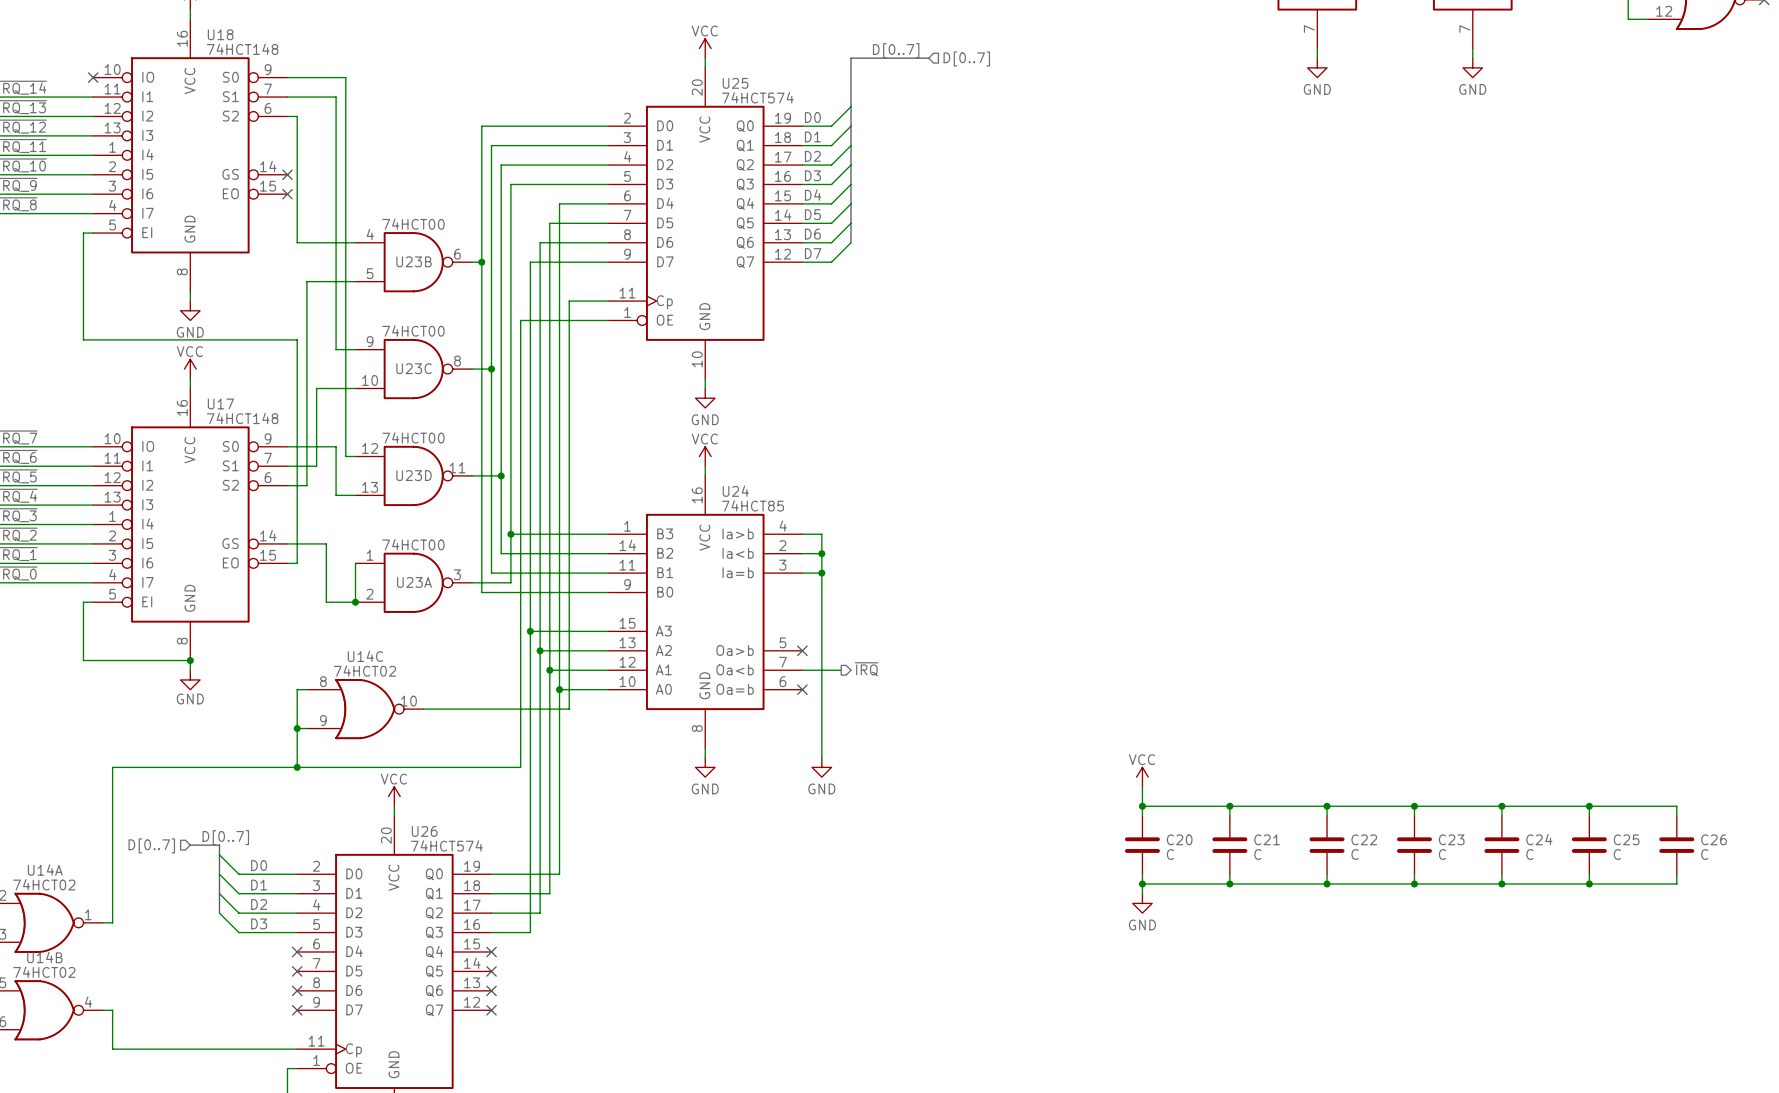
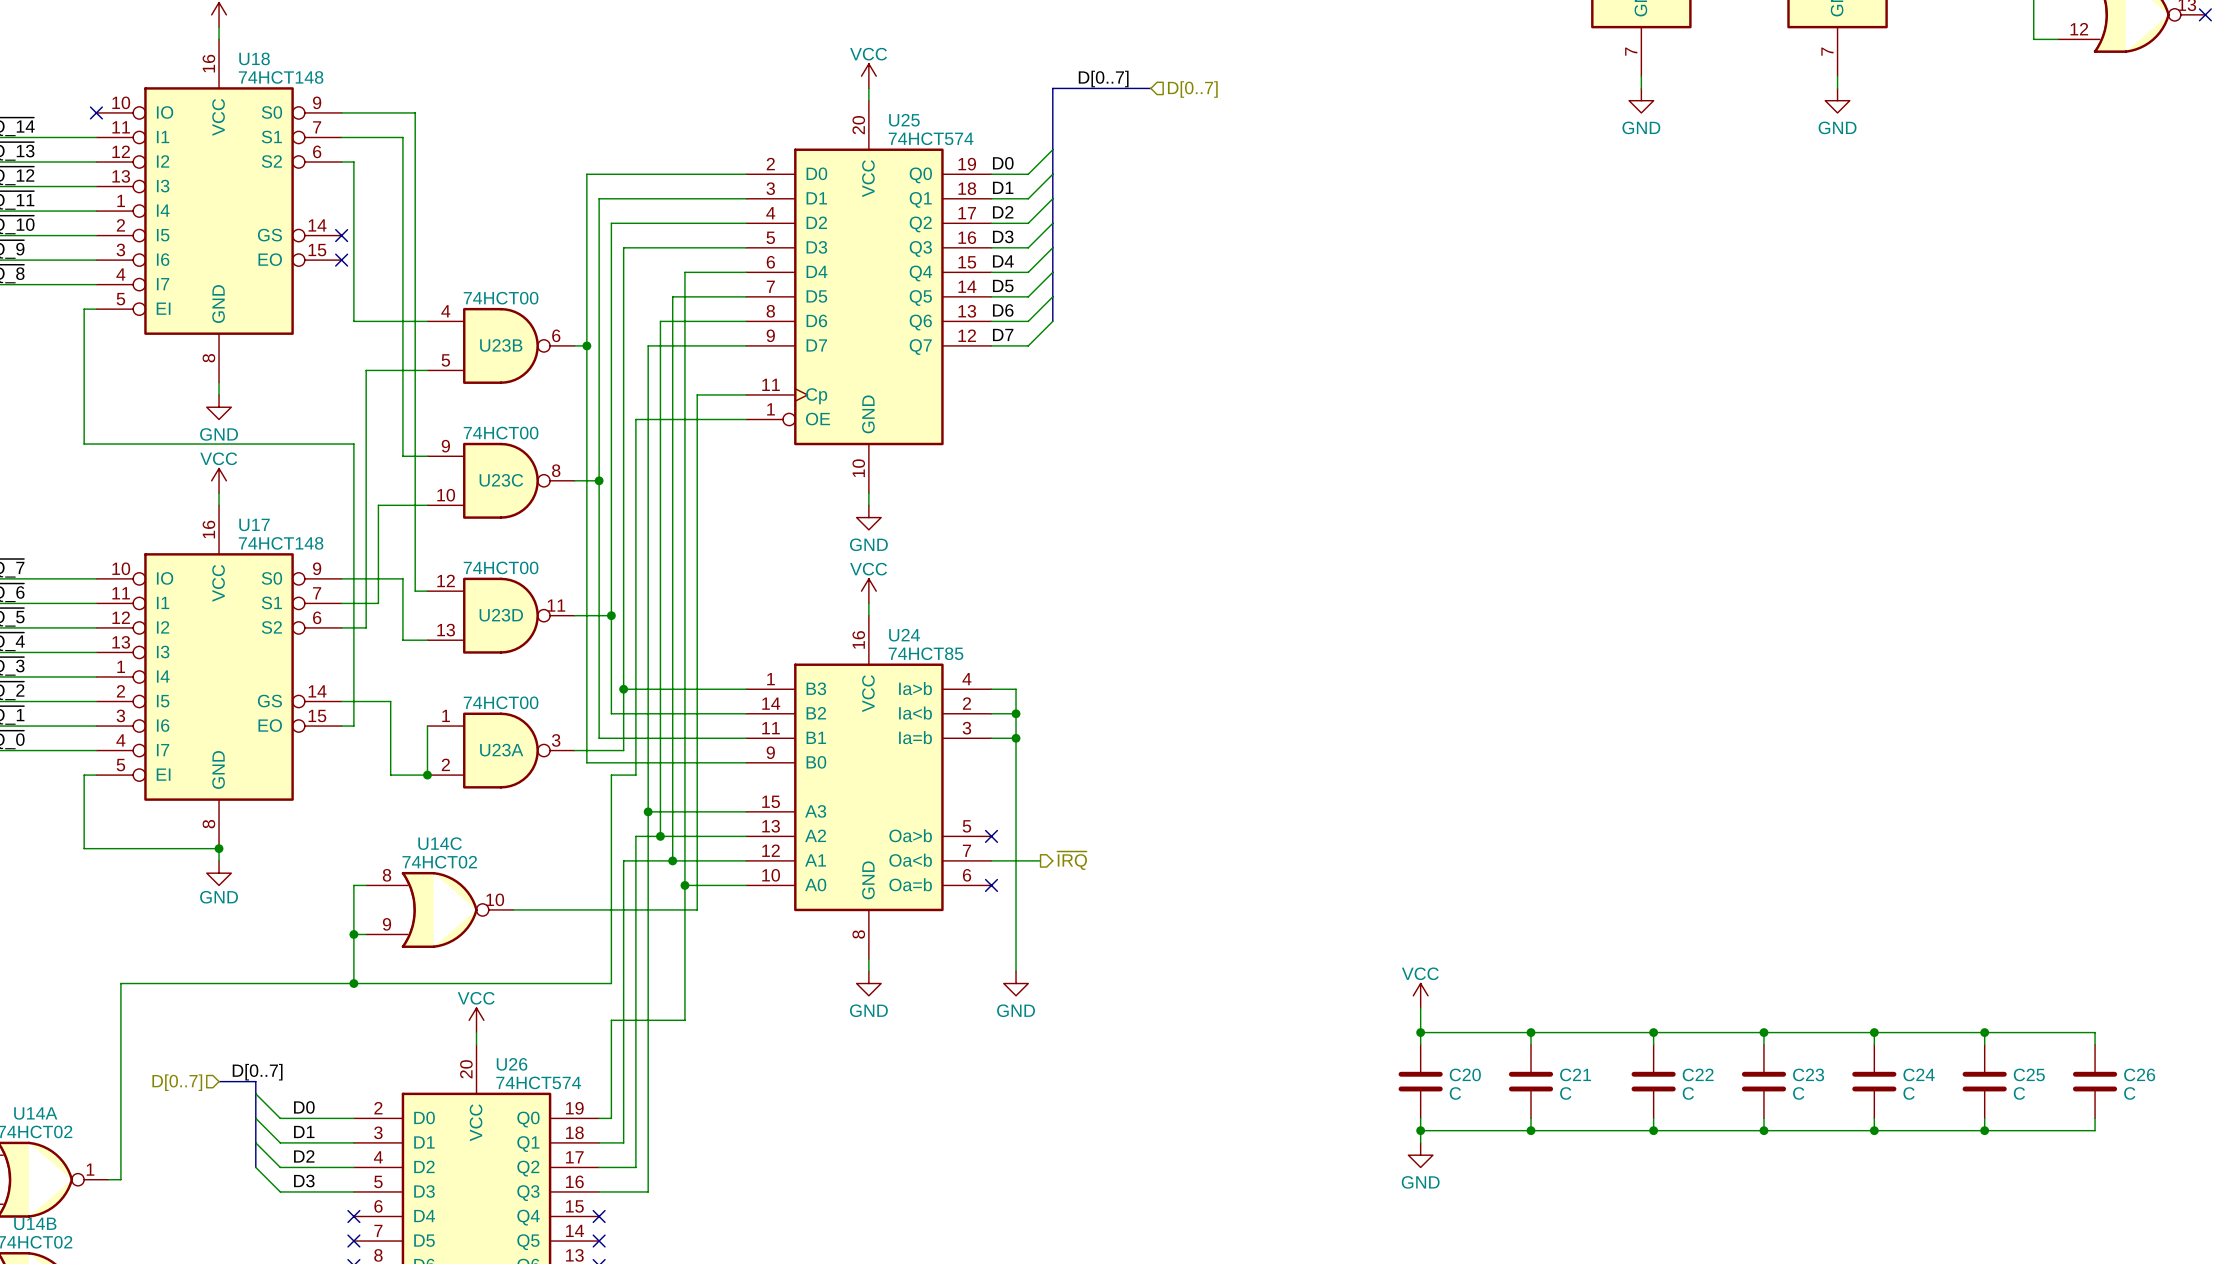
wire: (520, 602) (520, 650) -> (660, 836) (635, 836)
wire: (540, 650) (540, 913) (520, 913) -> (635, 983) (635, 1167)
wire: (549, 670) (549, 893) (510, 893) -> (672, 860) (623, 860) (623, 1142)
wire: (501, 767) (520, 767) -> (611, 983) (611, 775) (635, 775)
wire: (559, 796) (559, 874) (501, 874) -> (684, 1020) (611, 1020) (611, 1118)

